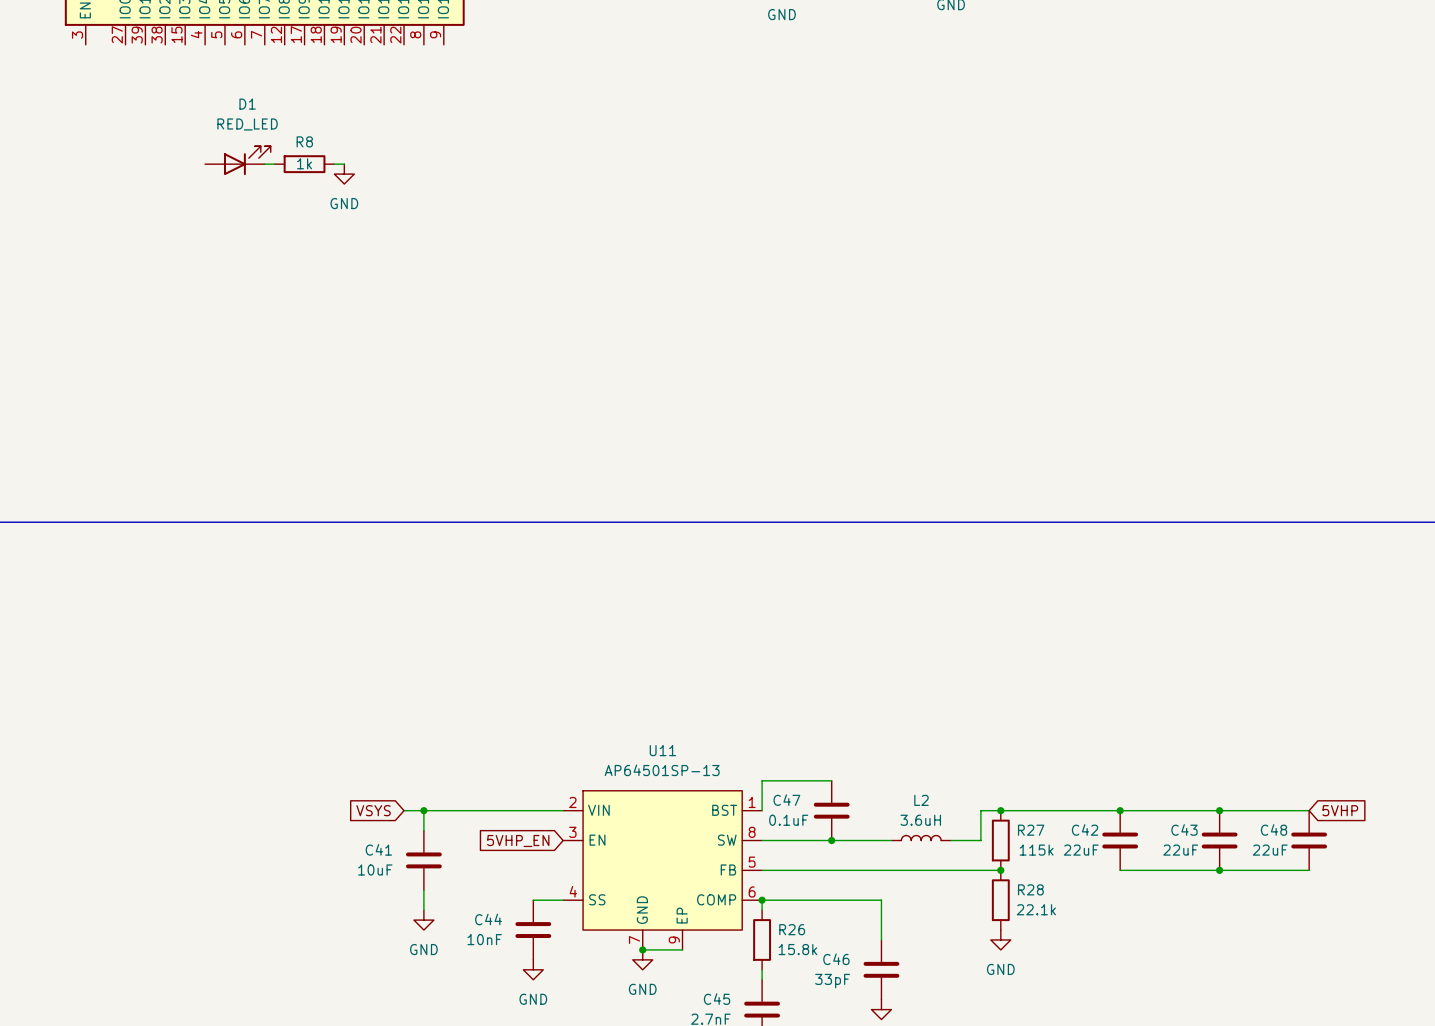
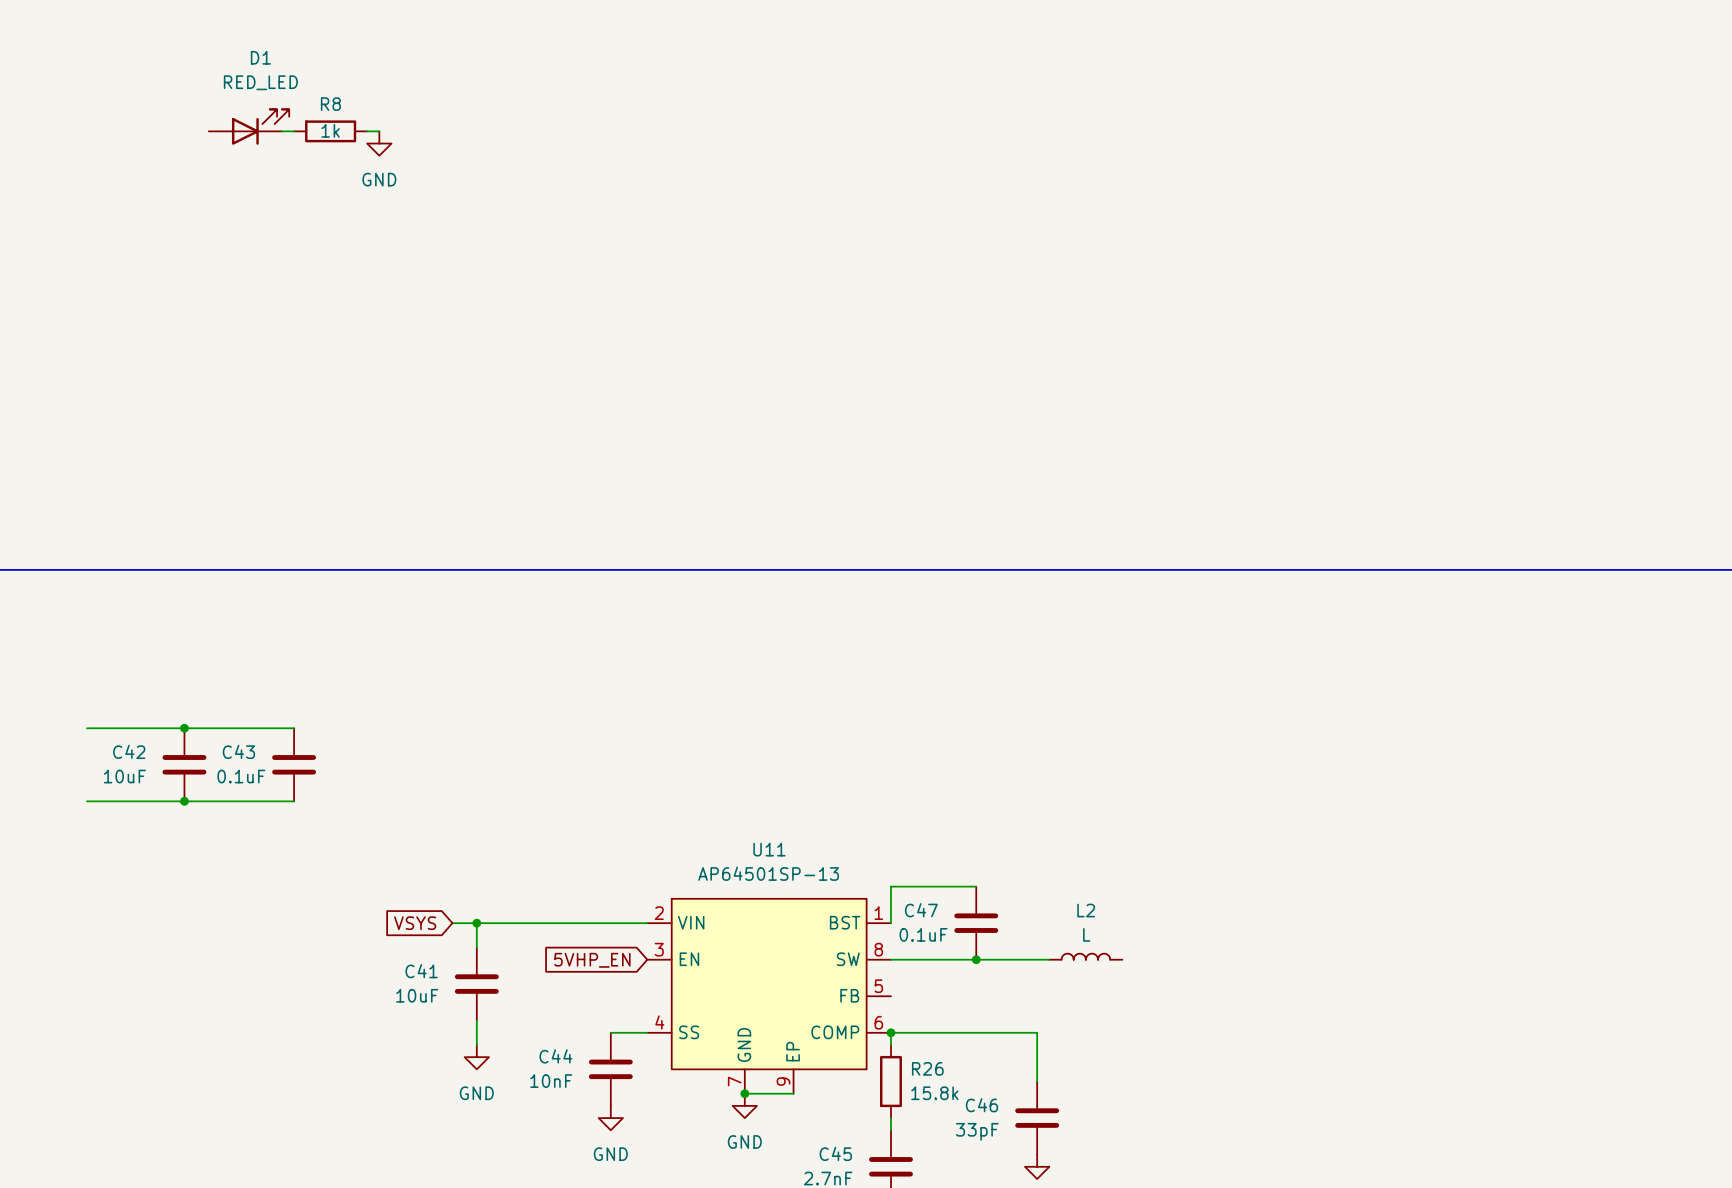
wire: none -> (86, 728) (294, 728)
junction: none -> (184, 728)
wire: none -> (86, 801) (294, 801)
junction: none -> (184, 801)
junction: (1000, 810) -> none
junction: (1120, 810) -> none
junction: (1219, 810) -> none
wire: (1309, 810) (980, 810) (980, 840) (951, 840) -> none
global label: 5VHP (1340, 810) -> none
L2 value: 3.6uH (920, 820) -> L (1086, 934)
C42 name position: C42 (1085, 829) -> C42 (129, 751)
C43 name position: C43 (1184, 829) -> C43 (238, 751)
R27: 115k (1000, 840) -> none
C42 position: (1120, 840) -> (184, 764)
C43 position: (1219, 840) -> (294, 764)
C48: 22uF (1309, 840) -> none
C42 value: 22uF (1081, 850) -> 10uF (124, 776)
C43 value: 22uF (1180, 850) -> 0.1uF (241, 776)
wire: (762, 870) (1000, 870) -> none
junction: (1000, 870) -> none
wire: (1120, 870) (1309, 870) -> none
junction: (1219, 870) -> none
R28: 22.1k (1000, 900) -> none
power symbol: GND (1000, 939) -> none

